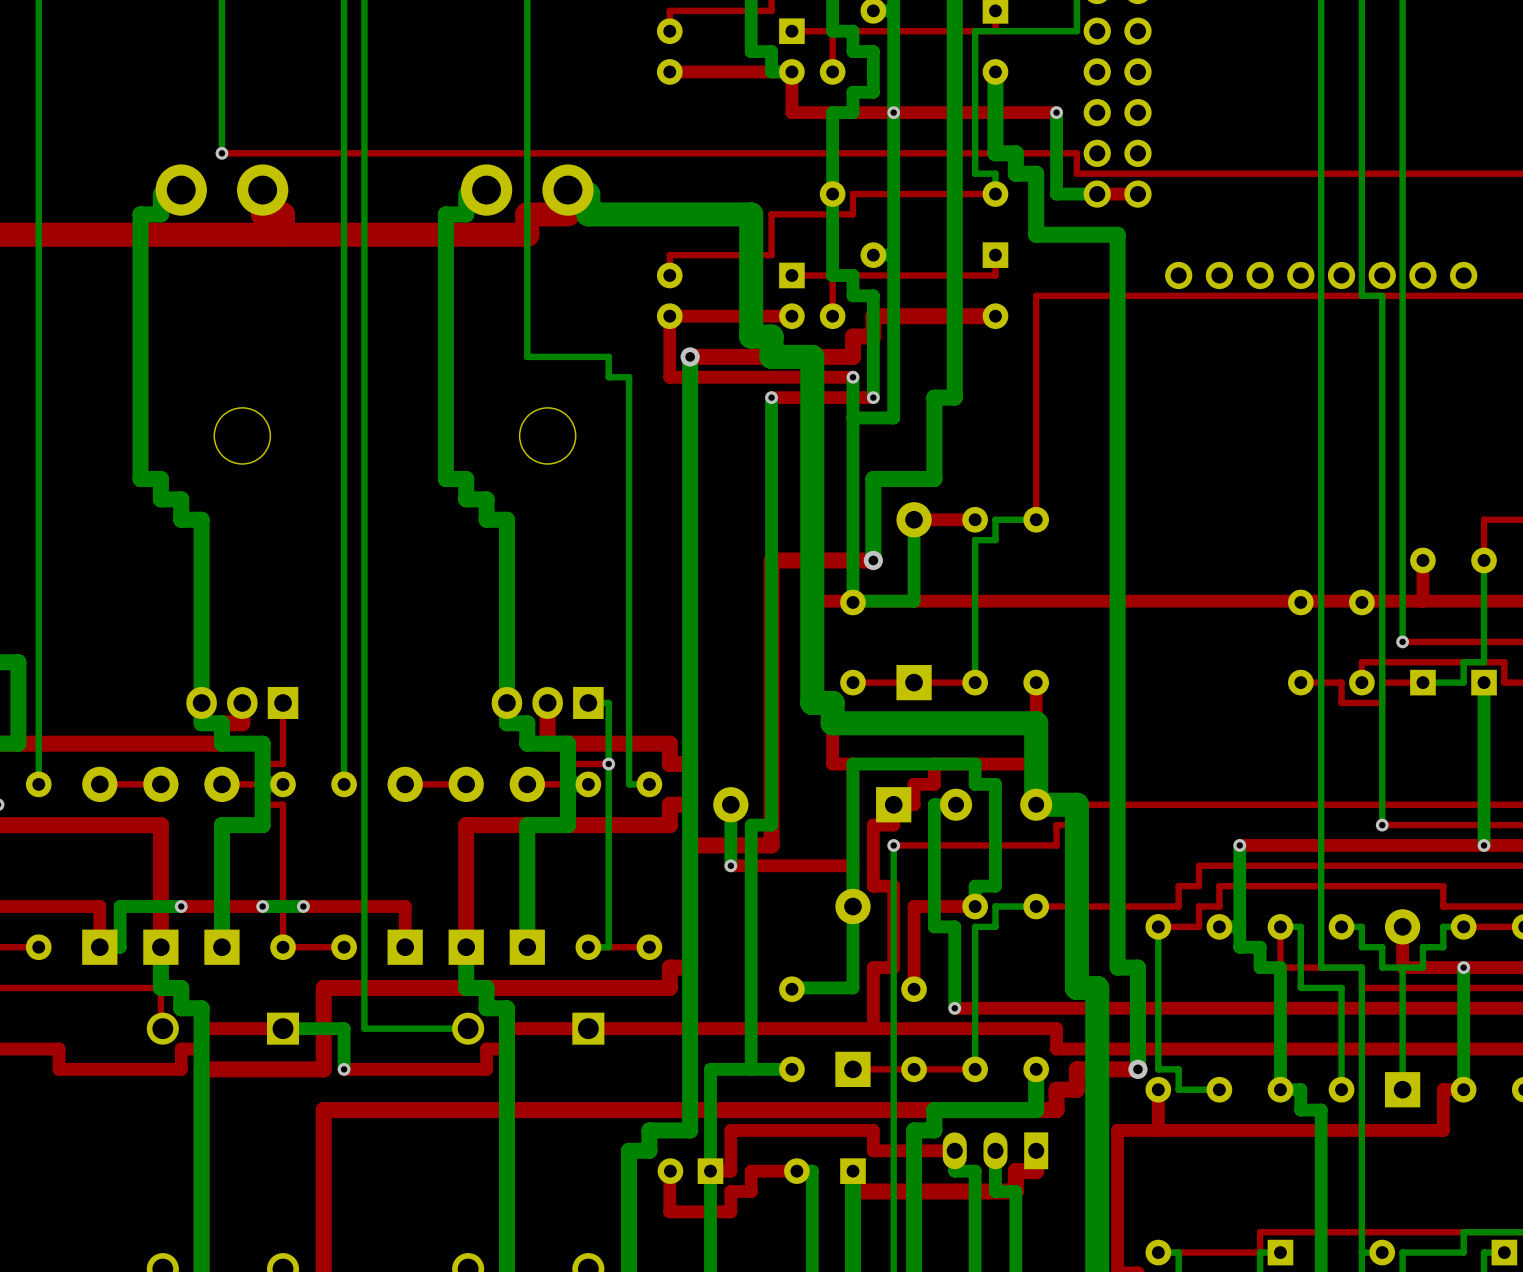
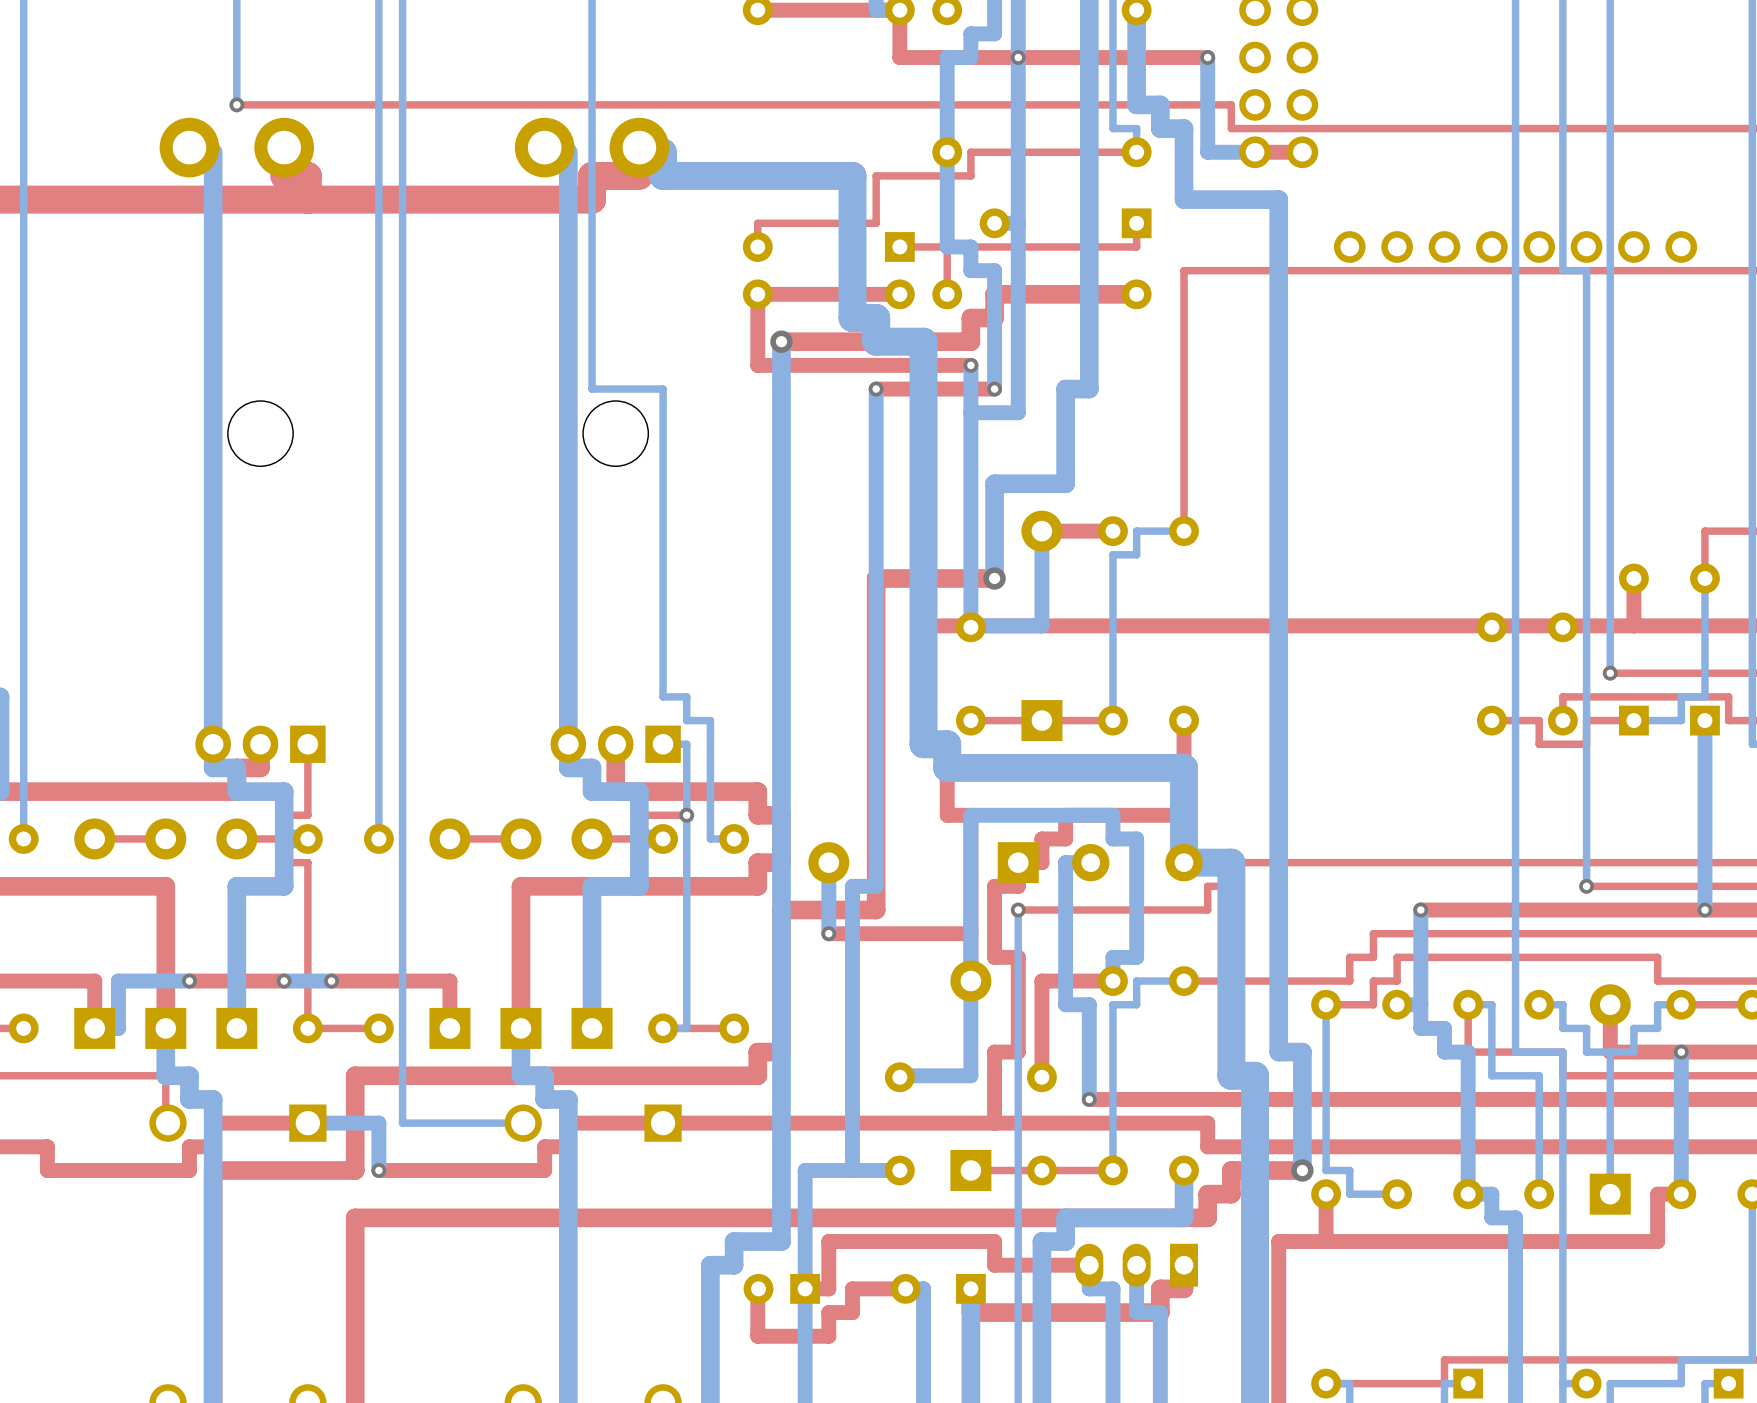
bottom track: (160, 194) (160, 214) (140, 214) (140, 479) (160, 479) (160, 499) (181, 499) (181, 519) (201, 519) -> (213, 152) (213, 531)
bottom track: (466, 194) (466, 214) (445, 214) (445, 479) (466, 479) (466, 499) (486, 499) (486, 519) (506, 519) -> (568, 152) (568, 531)
bottom track: (527, 356) (608, 356) (608, 377) (629, 377) (629, 682) -> (592, 341) (592, 389) (663, 389) (663, 696) (686, 696) (686, 720) (710, 720)

